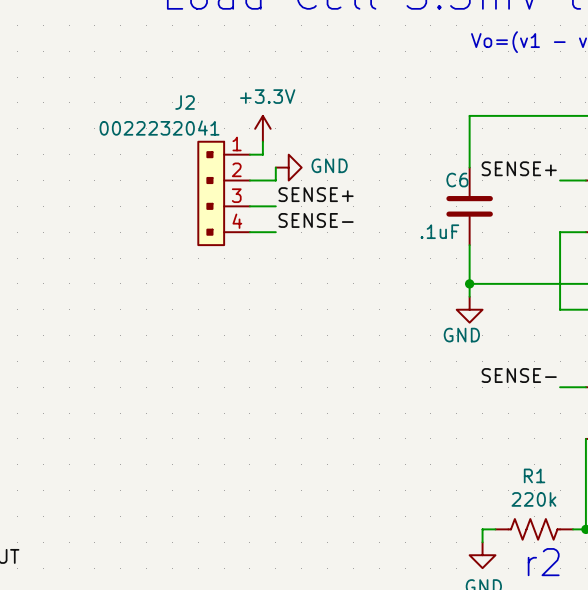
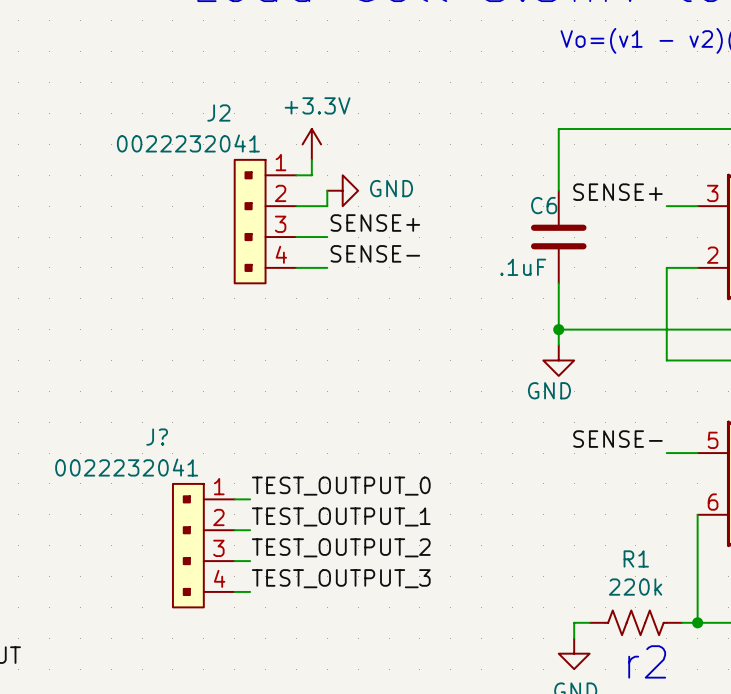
label: none -> TEST_OUTPUT_0 (341, 486)
wire: none -> (234, 499) (250, 499)
label: none -> TEST_OUTPUT_1 (341, 516)
wire: none -> (234, 530) (250, 530)
J?: none -> 0022232041 (203, 545)
label: none -> TEST_OUTPUT_2 (341, 547)
wire: none -> (234, 561) (250, 561)
label: none -> TEST_OUTPUT_3 (341, 578)
wire: none -> (234, 591) (250, 591)

